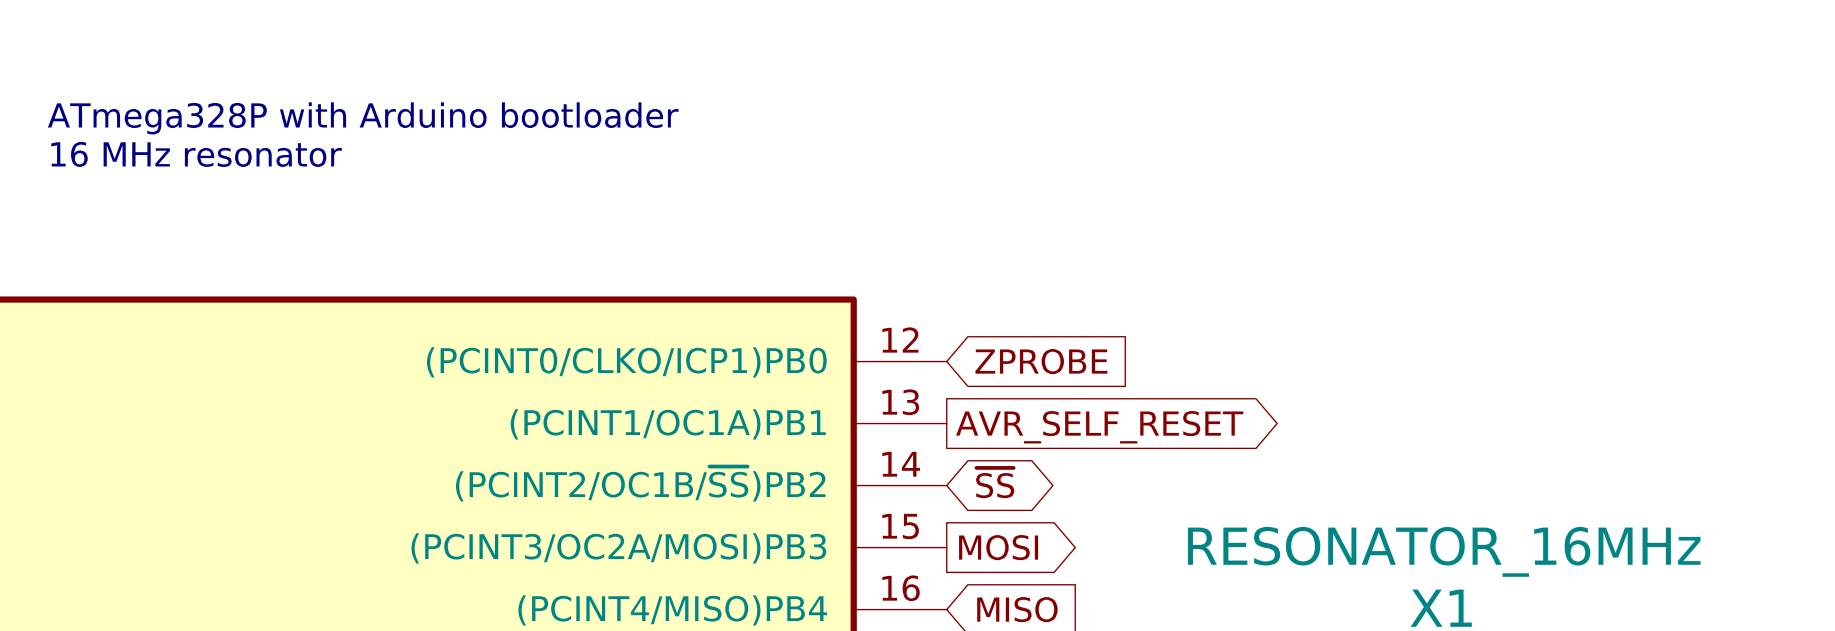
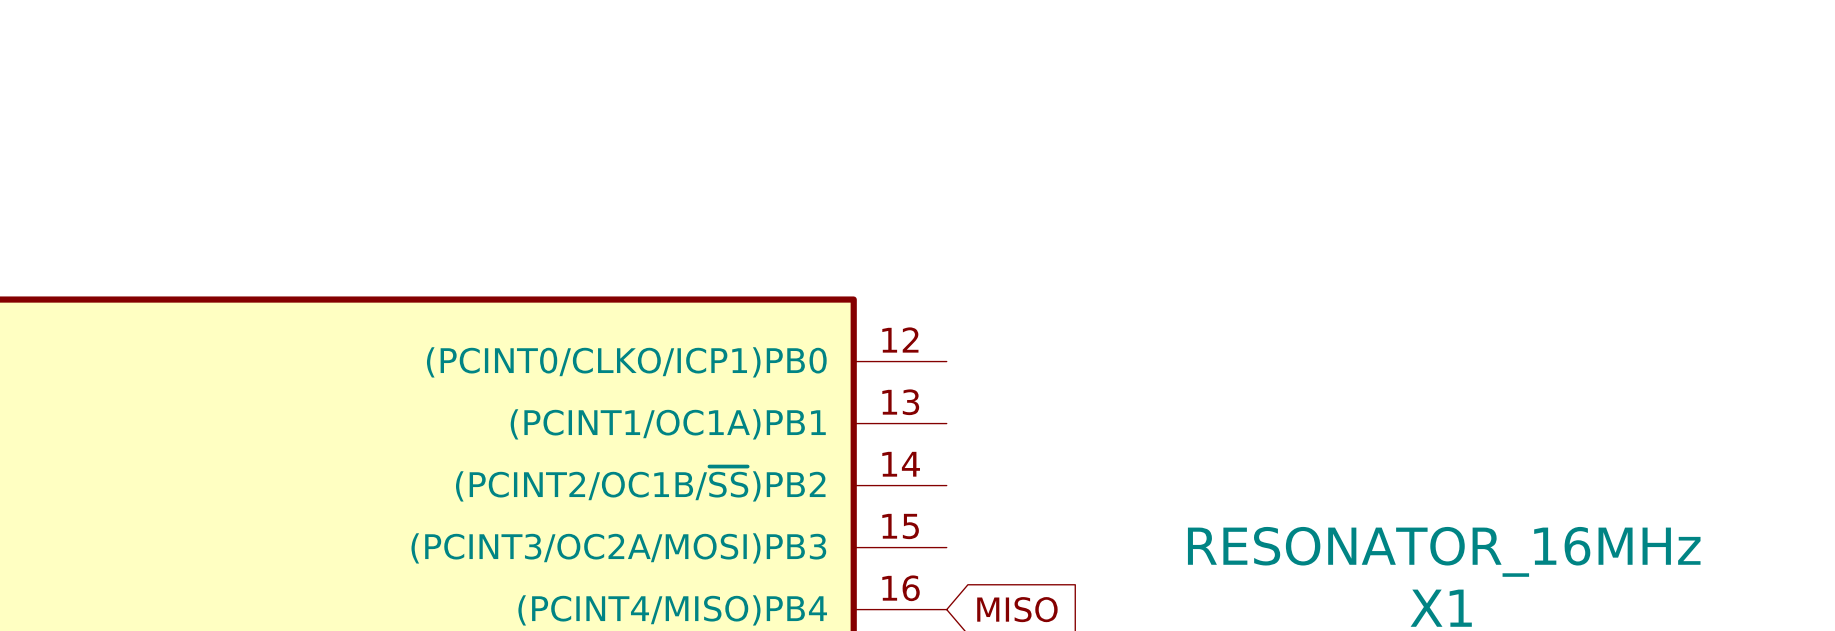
text: ATmega328P with Arduino bootloader (363, 118) -> none
text: 16 MHz resonator (196, 154) -> none
global label: ZPROBE (1041, 361) -> none
global label: AVR_SELF_RESET (1099, 427) -> none
global label: ~{SS} (995, 483) -> none
global label: MOSI (998, 547) -> none

